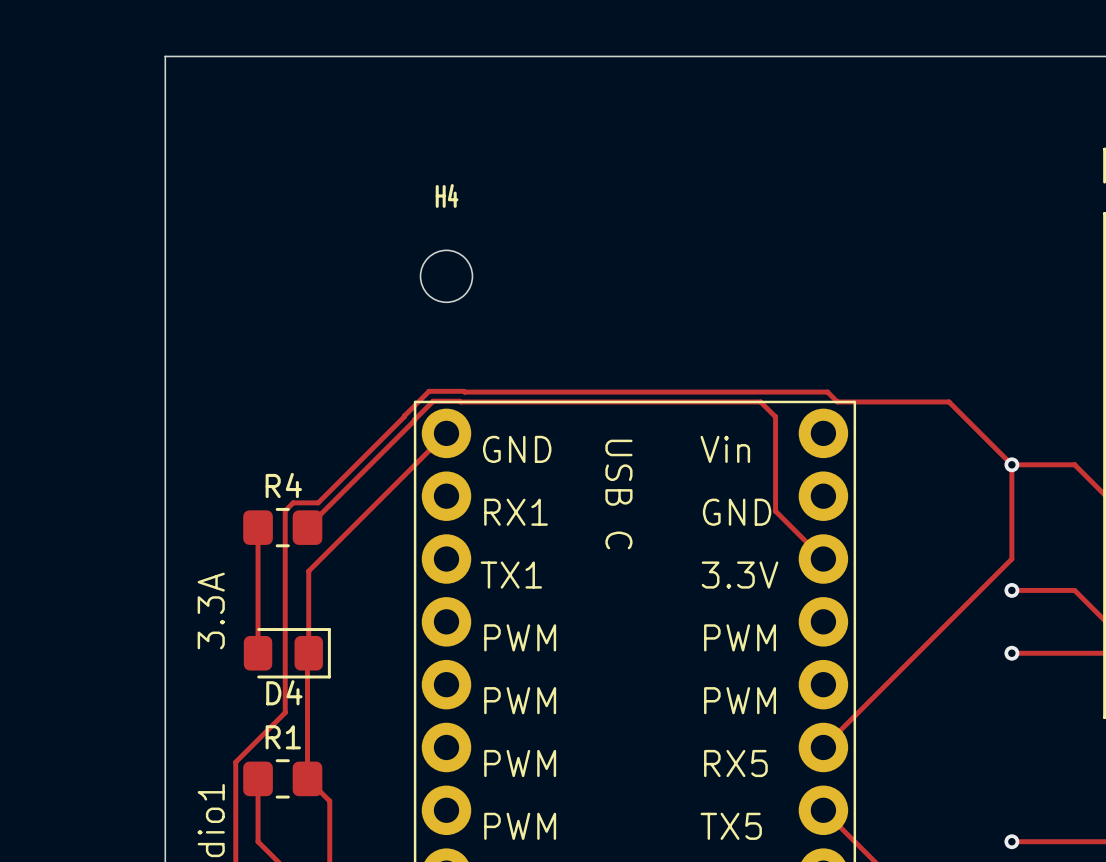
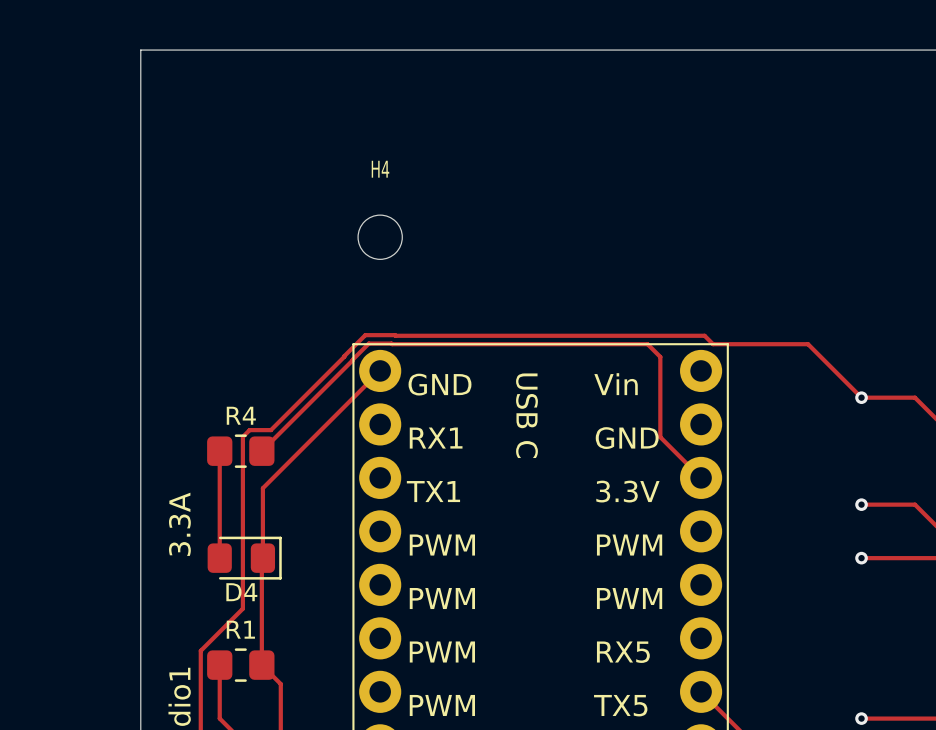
track: (1011, 464) (1011, 559) (823, 747) -> none

